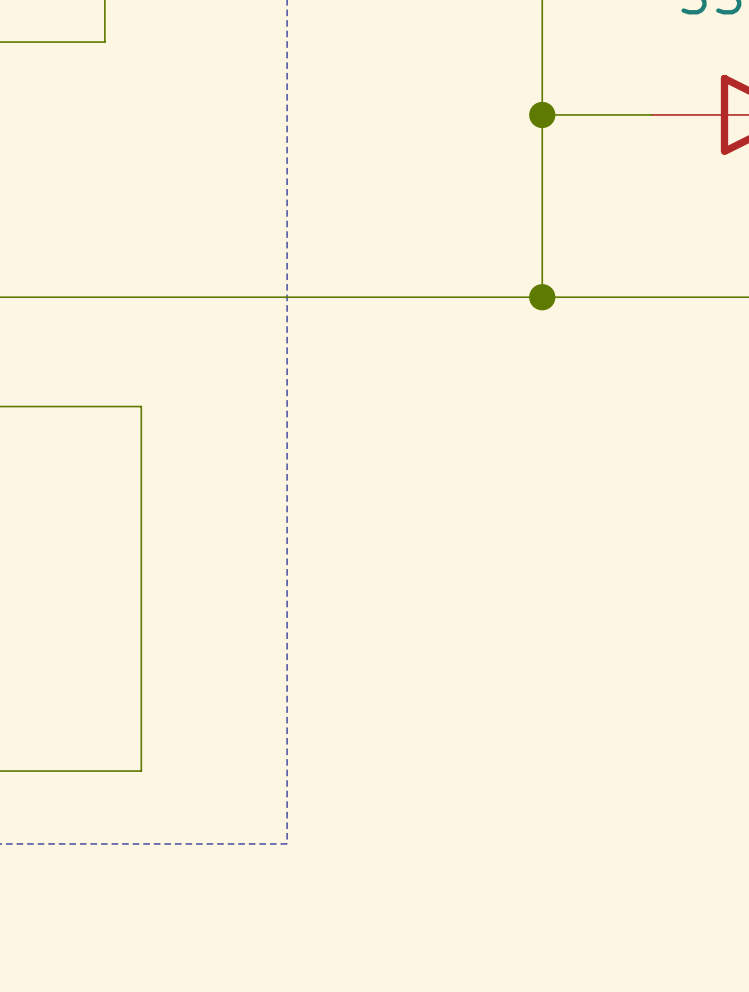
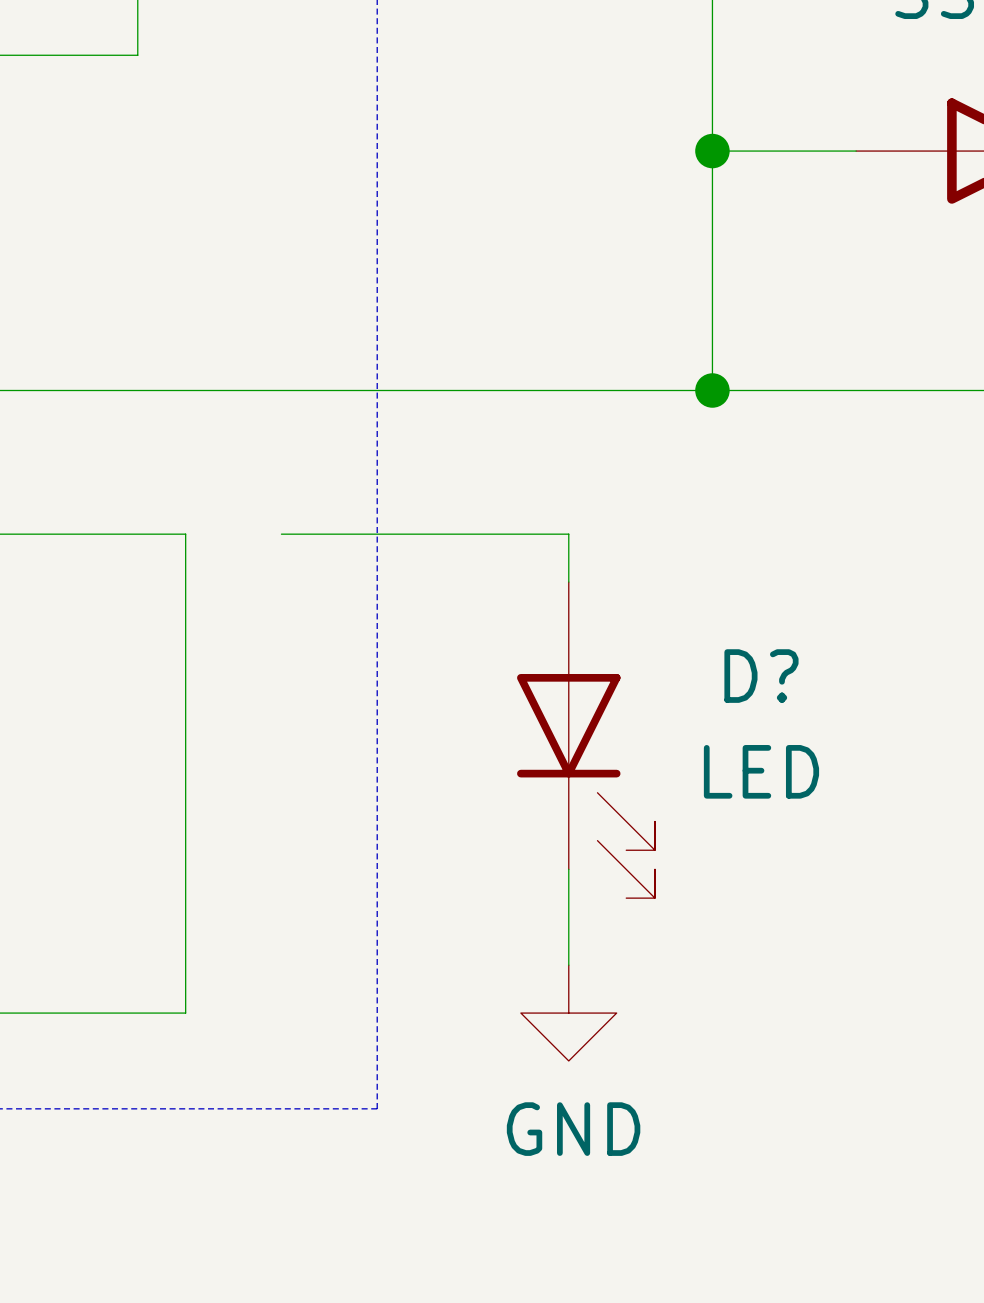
wire: none -> (281, 534) (568, 534) (568, 582)
D?: none -> LED (586, 740)
wire: none -> (568, 869) (568, 965)
power symbol: none -> GND (568, 1013)

